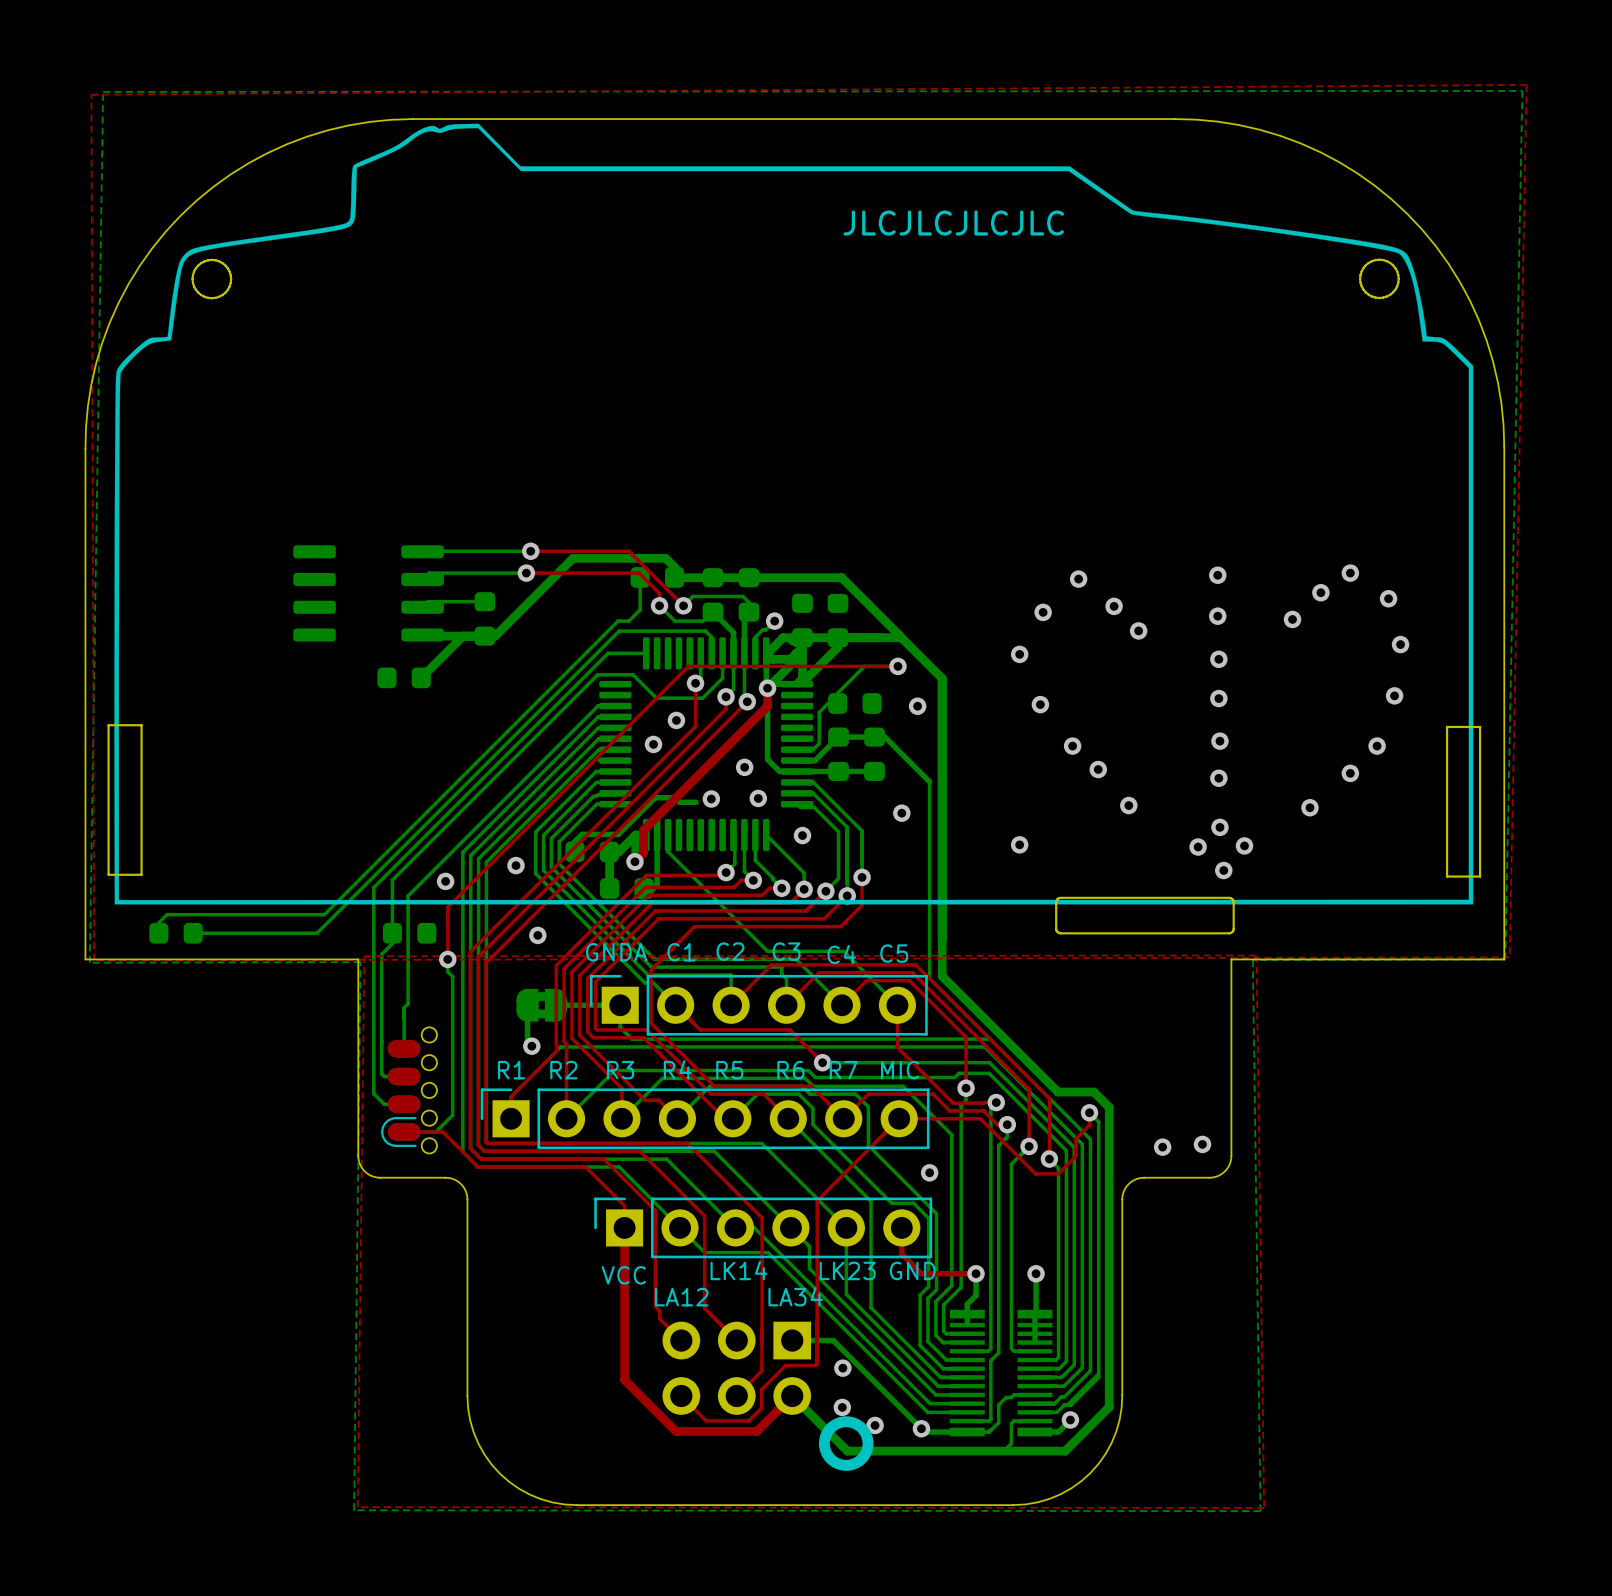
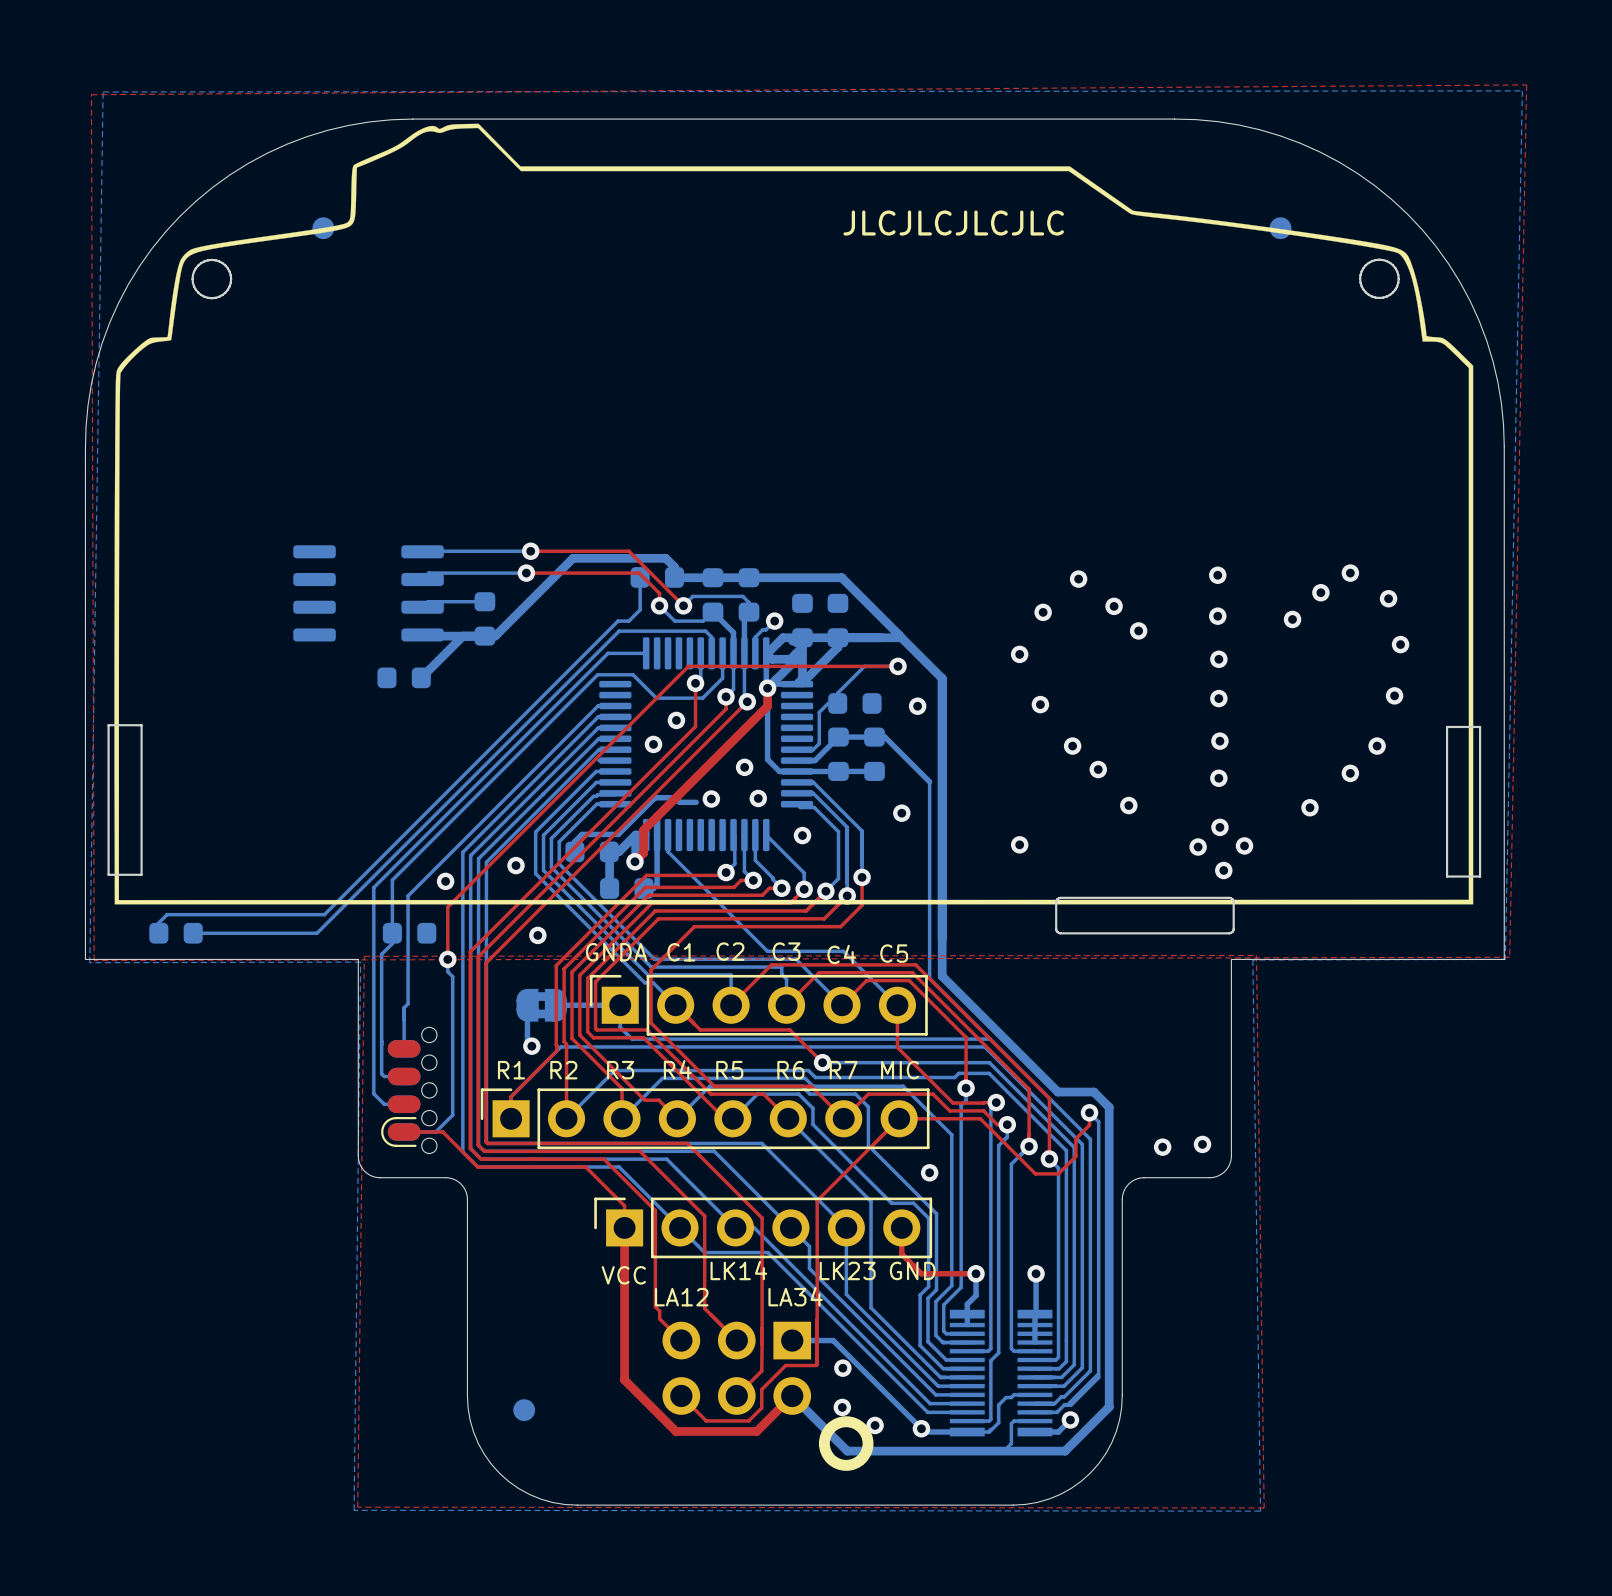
part: none -> (323, 228)
part: none -> (1280, 228)
part: none -> (524, 1410)

